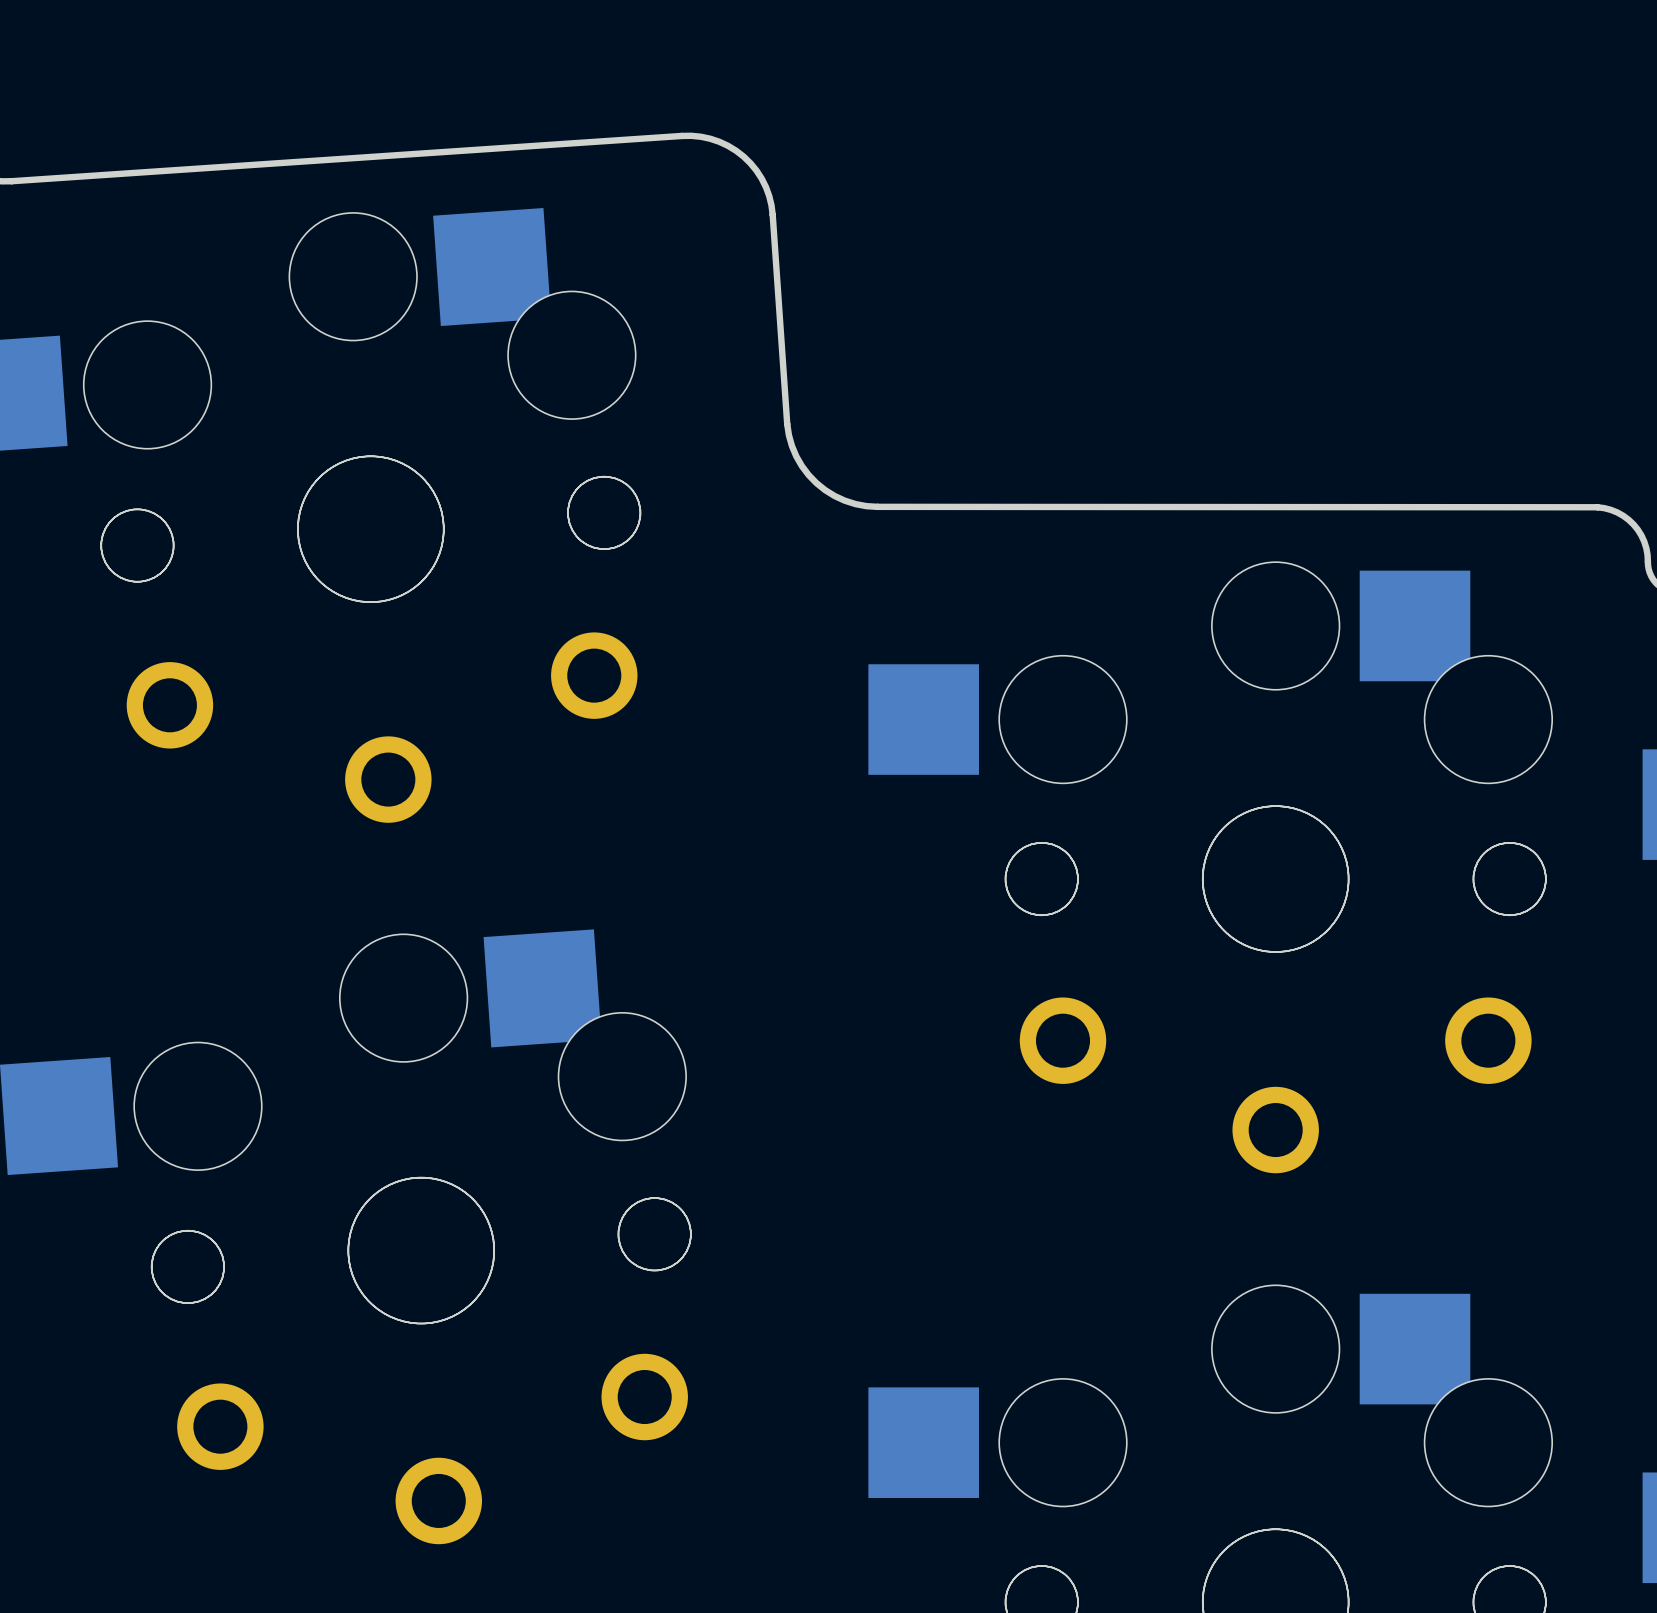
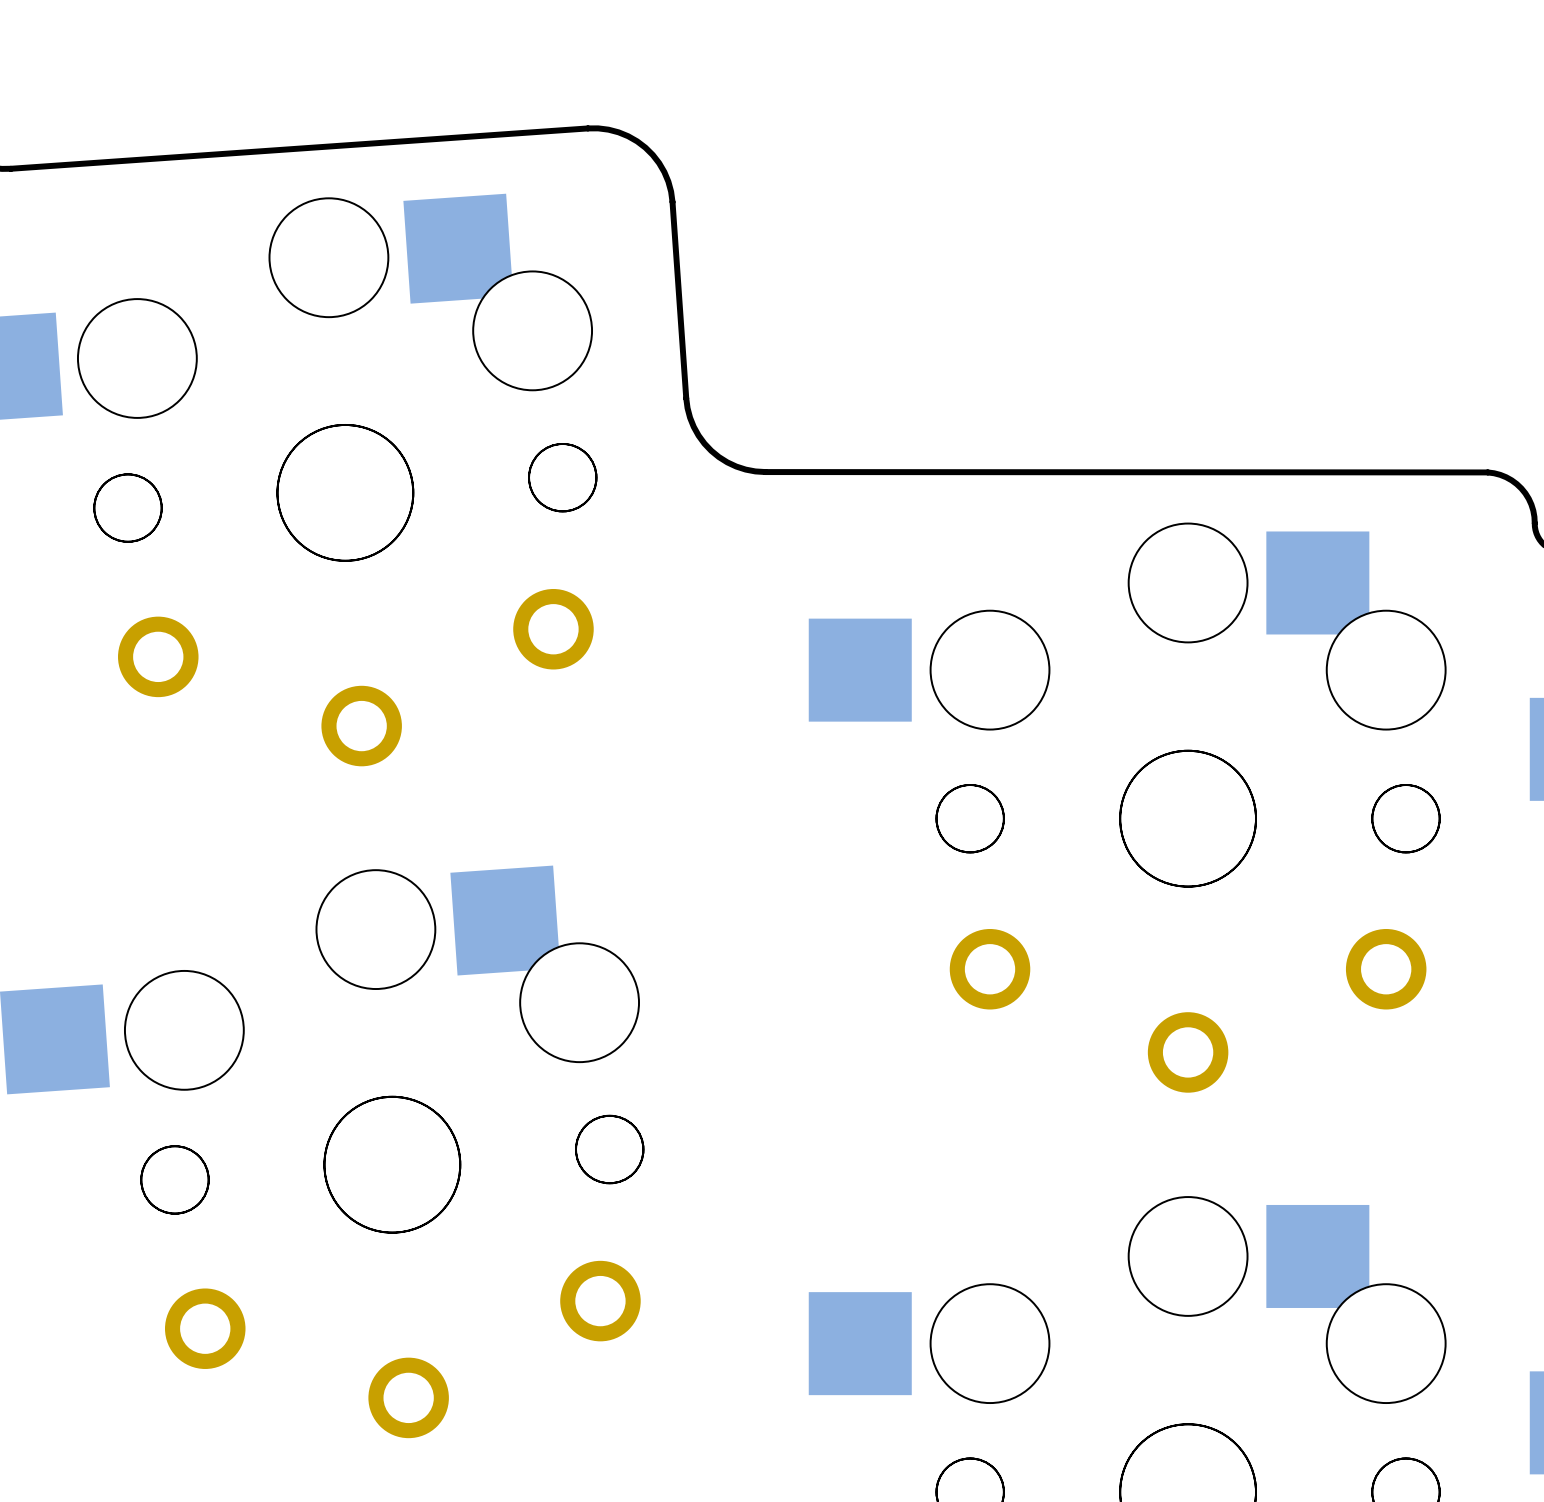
board edge: (11, 181) (681, 135) (700, 136) (719, 141) (743, 156) (756, 170) (765, 187) (772, 214) (788, 435) (796, 456) (808, 475) (825, 490) (844, 500) (877, 506) (1597, 507) -> (10, 168) (587, 128) (608, 129) (628, 136) (645, 147) (659, 163) (668, 181) (672, 201) (687, 408) (693, 426) (704, 443) (718, 457) (736, 466) (765, 472) (1487, 472)

